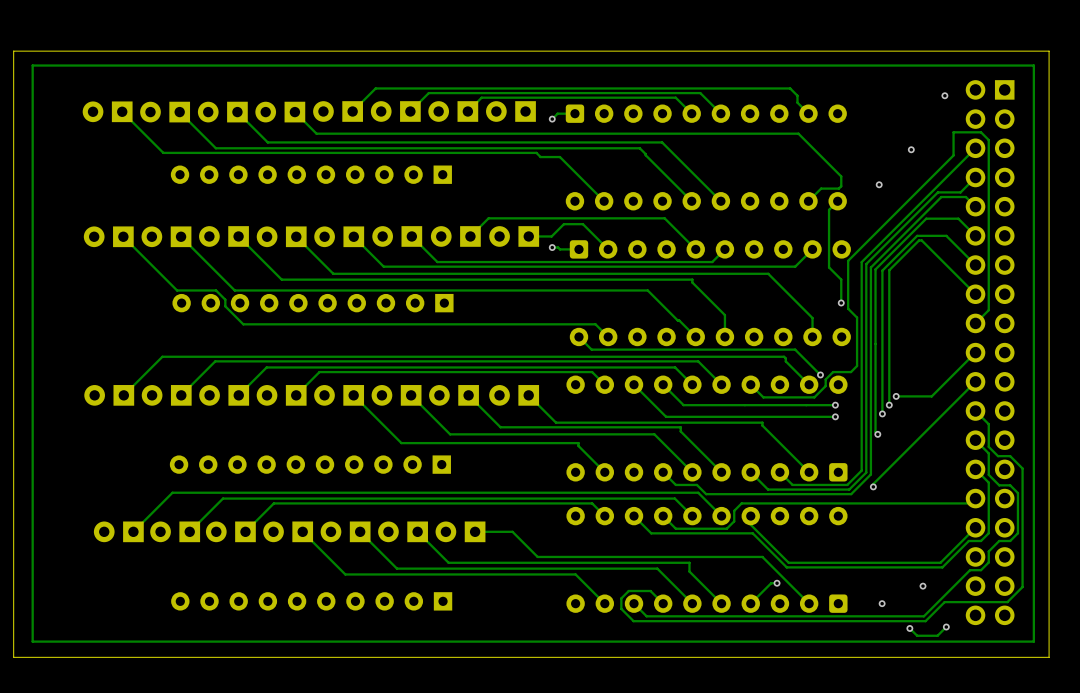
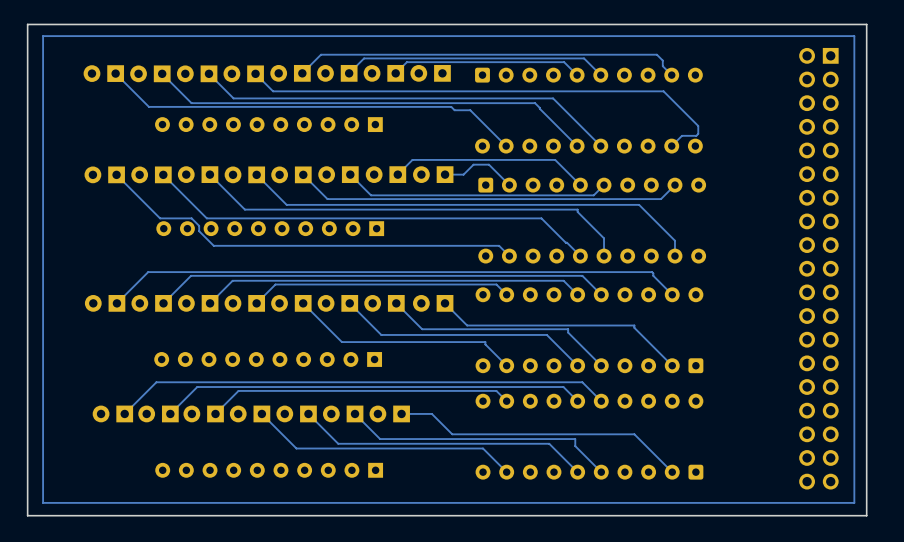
via: (944, 95) -> none
track: (574, 113) (557, 113) (552, 119) -> none
via: (552, 119) -> none
track: (975, 148) (861, 262) (861, 470) (847, 484) (792, 484) (779, 472) -> none
via: (911, 149) -> none
track: (975, 177) (960, 192) (937, 192) (866, 264) (866, 472) (849, 489) (768, 489) (750, 472) -> none
via: (879, 184) -> none
track: (837, 201) (829, 209) (829, 267) (841, 279) (841, 302) -> none
track: (975, 206) (965, 197) (941, 197) (870, 267) (870, 474) (851, 494) (706, 494) (696, 484) (675, 484) (663, 472) -> none
track: (975, 235) (958, 218) (926, 218) (875, 269) (875, 432) (877, 434) -> none
track: (552, 247) (578, 249) -> none
via: (552, 247) -> none
track: (975, 265) (946, 235) (917, 235) (882, 270) (882, 413) -> none
track: (975, 294) (921, 240) (919, 240) (889, 270) (889, 405) -> none
via: (841, 302) -> none
track: (975, 323) (988, 310) (988, 140) (981, 132) (953, 132) (953, 155) (848, 260) (848, 308) (857, 317) (857, 365) (850, 372) (833, 372) (825, 379) (825, 386) (814, 397) (763, 397) (750, 384) -> none
track: (578, 336) (591, 349) (795, 349) (820, 374) -> none
track: (975, 352) (931, 396) (896, 396) -> none
via: (820, 374) -> none
track: (975, 381) (873, 483) (873, 486) -> none
track: (634, 384) (666, 416) (835, 416) -> none
track: (663, 384) (683, 405) (835, 405) -> none
via: (896, 396) -> none
via: (835, 405) -> none
via: (889, 405) -> none
track: (975, 411) (988, 424) (988, 446) (998, 456) (1010, 456) (1022, 468) (1022, 587) (1007, 602) (944, 602) (925, 621) (633, 621) (621, 608) (621, 598) (628, 591) (650, 591) (663, 603) -> none
via: (882, 413) -> none
via: (835, 416) -> none
via: (877, 434) -> none
track: (975, 440) (988, 453) (988, 474) (999, 485) (1010, 485) (1017, 493) (1017, 533) (1010, 540) (999, 540) (988, 551) (988, 562) (981, 570) (970, 570) (923, 616) (646, 616) (634, 603) -> none
track: (975, 469) (988, 482) (988, 533) (981, 540) (968, 540) (942, 567) (786, 567) (752, 533) (651, 533) (634, 516) -> none
via: (873, 486) -> none
track: (975, 498) (970, 503) (741, 503) (734, 510) (734, 521) (726, 528) (675, 528) (663, 516) -> none
track: (750, 516) (750, 524) (788, 562) (940, 562) (975, 527) -> none
track: (777, 583) (771, 583) (750, 603) -> none
via: (777, 583) -> none
via: (922, 586) -> none
via: (882, 603) -> none
track: (946, 627) (937, 635) (917, 635) (909, 628) -> none
via: (946, 627) -> none
via: (909, 628) -> none

